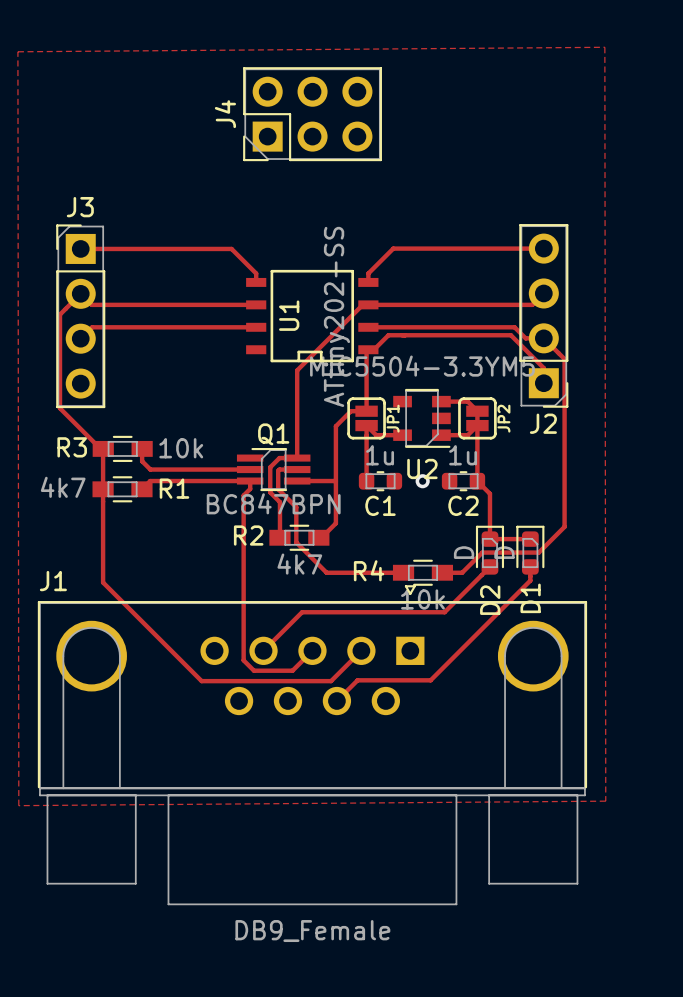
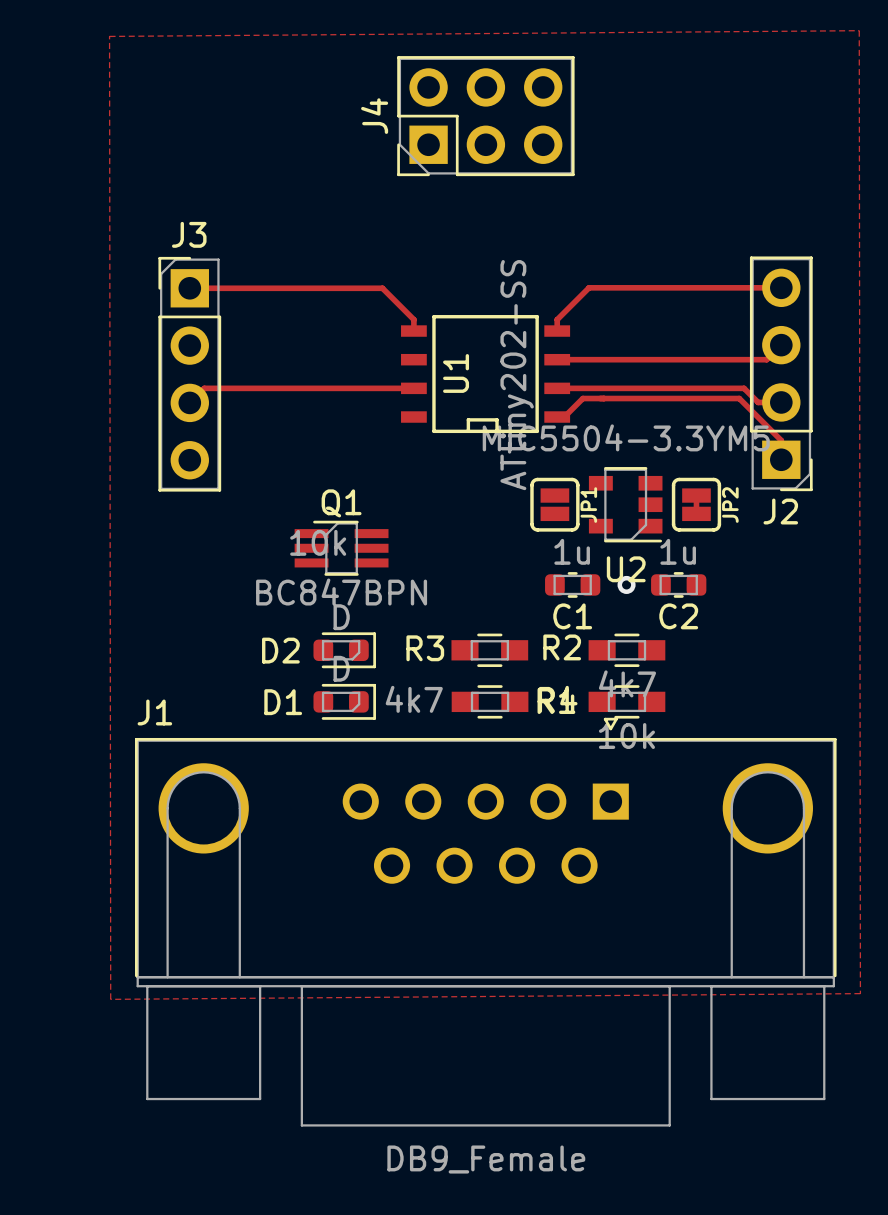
track: (256, 304) (91, 304) (80, 293) (59, 314) (59, 408) (100, 448) (103, 448) -> none
track: (368, 304) (362, 304) (297, 370) (297, 458) (279, 458) (270, 467) (270, 492) (279, 502) (279, 537) -> none
track: (543, 338) (564, 359) (564, 526) (538, 552) (482, 552) (462, 572) (442, 572) -> none
track: (368, 349) (366, 351) (366, 411) (350, 411) (335, 426) (335, 523) (321, 537) (318, 537) -> none
track: (441, 401) (467, 401) (477, 411) -> none
track: (402, 435) (376, 435) (366, 425) (366, 481) -> none
track: (441, 435) (467, 435) (477, 425) (477, 481) (489, 493) (489, 539) (530, 539) -> none
R3 position: (122, 448) -> (489, 650)
track: (142, 448) (142, 461) (150, 469) (250, 469) -> none
track: (103, 449) (103, 582) (201, 681) (331, 681) (361, 650) -> none
Q1 position: (273, 469) -> (341, 548)
track: (297, 469) (278, 470) (278, 489) (296, 507) (296, 542) (326, 572) (403, 572) -> none
track: (297, 481) (335, 481) -> none
R1 position: (122, 489) -> (490, 701)
track: (141, 489) (150, 481) (250, 481) (250, 488) (243, 495) (243, 660) (253, 670) (292, 670) (312, 650) -> none
R2 position: (299, 537) -> (626, 650)
D2 rotation: 0° (489, 550) -> 90° clockwise (344, 650)
D2 position: (489, 550) -> (344, 650)
D1 rotation: 0° (530, 550) -> 90° clockwise (344, 701)
D1 position: (530, 550) -> (344, 701)
track: (489, 566) (444, 612) (302, 612) (263, 650) -> none
track: (530, 566) (530, 580) (430, 680) (357, 680) (336, 701) -> none

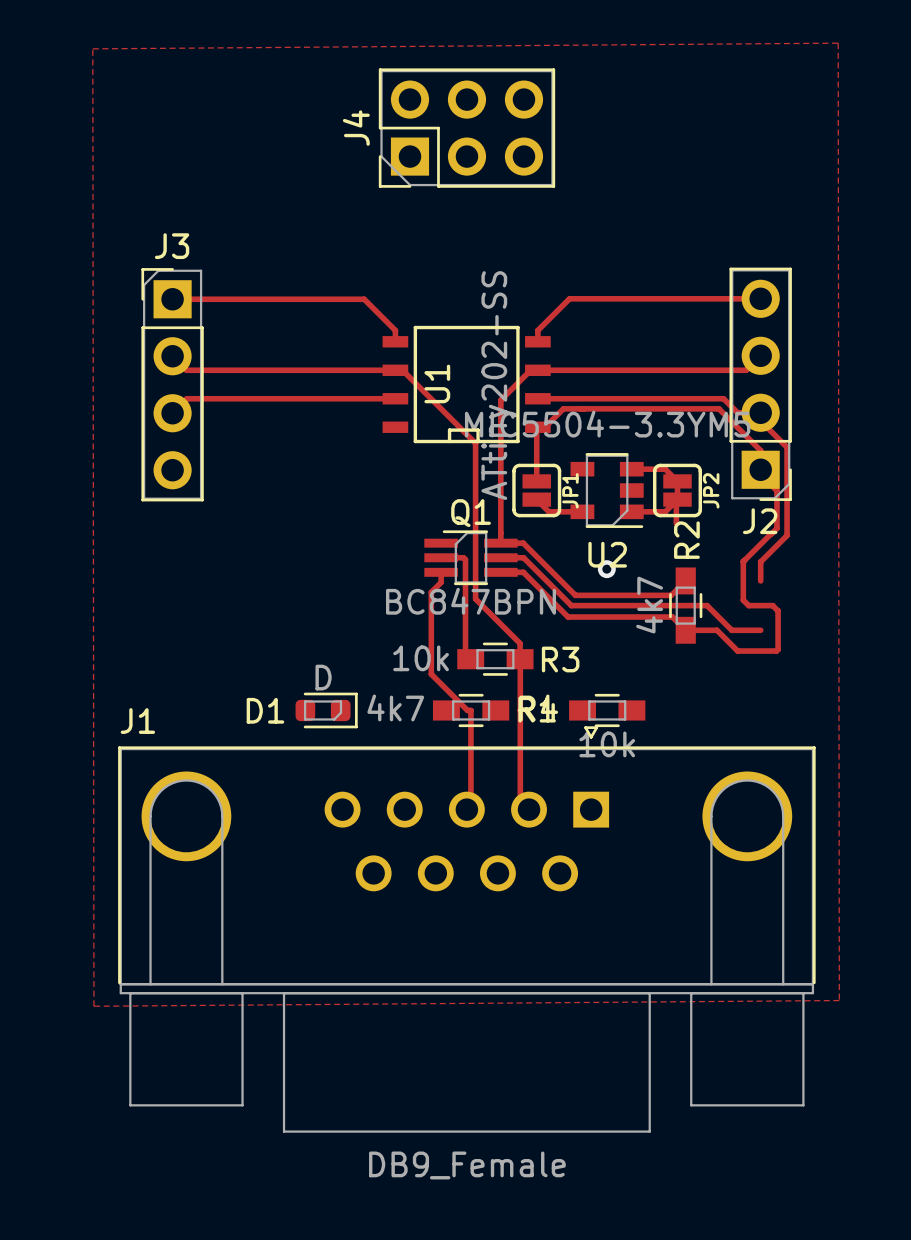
track: none -> (172, 356) (186, 370) (402, 370) (475, 443) (475, 599) (520, 643) (520, 659)
track: none -> (537, 370) (530, 370) (500, 400) (500, 543) (523, 543) (575, 595) (671, 595) (685, 580)
track: none -> (760, 412) (760, 420) (787, 447) (787, 535) (760, 561) (760, 580)
track: none -> (537, 427) (536, 481)
track: none -> (631, 469) (665, 469) (677, 481) (677, 499) (665, 511) (631, 511)
track: none -> (760, 469) (760, 474) (776, 490) (776, 528) (743, 561) (743, 600) (748, 605) (772, 605) (778, 610) (776, 651) (737, 651) (716, 630) (685, 630) (672, 617) (568, 617) (523, 572) (500, 572)
track: none -> (536, 499) (548, 511) (582, 511)
JP1 position: (554, 504) -> (536, 490)
U2 position: (625, 504) -> (607, 490)
JP2 position: (696, 504) -> (677, 490)
R3 value position: 10k (318, 542) -> 10k (421, 658)
Q1 position: (341, 548) -> (471, 557)
track: none -> (441, 557) (463, 557) (465, 559) (465, 653) (470, 659)
track: none -> (500, 557) (523, 557) (571, 605) (707, 605) (731, 630) (760, 630)
track: none -> (441, 572) (441, 582) (431, 592) (431, 674) (467, 710) (470, 710) (470, 805) (466, 809)
C1: 1u (572, 584) -> none
via position: (626, 584) -> (606, 569)
C2: 1u (678, 584) -> none
R3 name position: R3 (425, 648) -> R3 (560, 659)
D2: D (344, 650) -> none
R3 position: (489, 650) -> (495, 659)
track: none -> (520, 659) (520, 800) (529, 809)
R2 rotation: 0° (626, 650) -> 90° clockwise (685, 605)
R2 position: (626, 650) -> (685, 605)

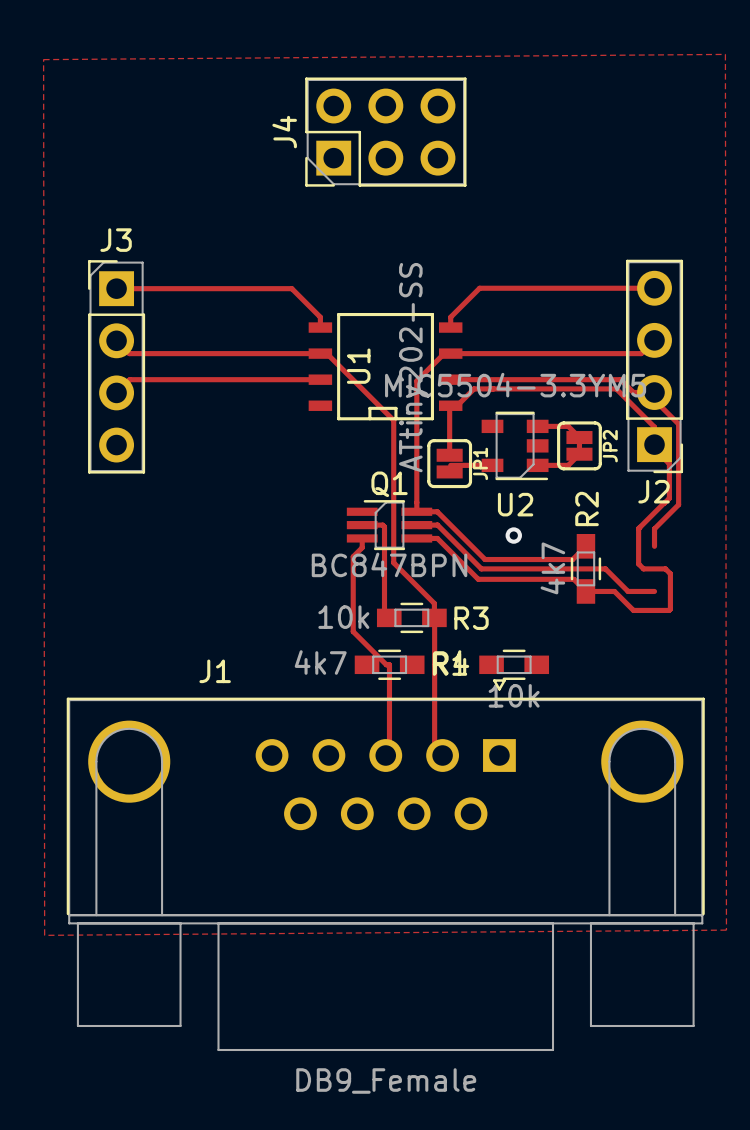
track: (631, 469) (665, 469) (677, 481) (677, 499) (665, 511) (631, 511) -> (537, 426) (568, 426) (579, 437) (579, 454) (568, 465) (537, 465)
U2 position: (607, 490) -> (515, 445)
JP2 position: (677, 490) -> (579, 445)
track: none -> (450, 465) (492, 465)
track: (536, 499) (548, 511) (582, 511) -> none
track: (676, 505) (676, 523) -> none
D1: D (326, 710) -> none
J1 name position: J1 (137, 721) -> J1 (215, 671)

